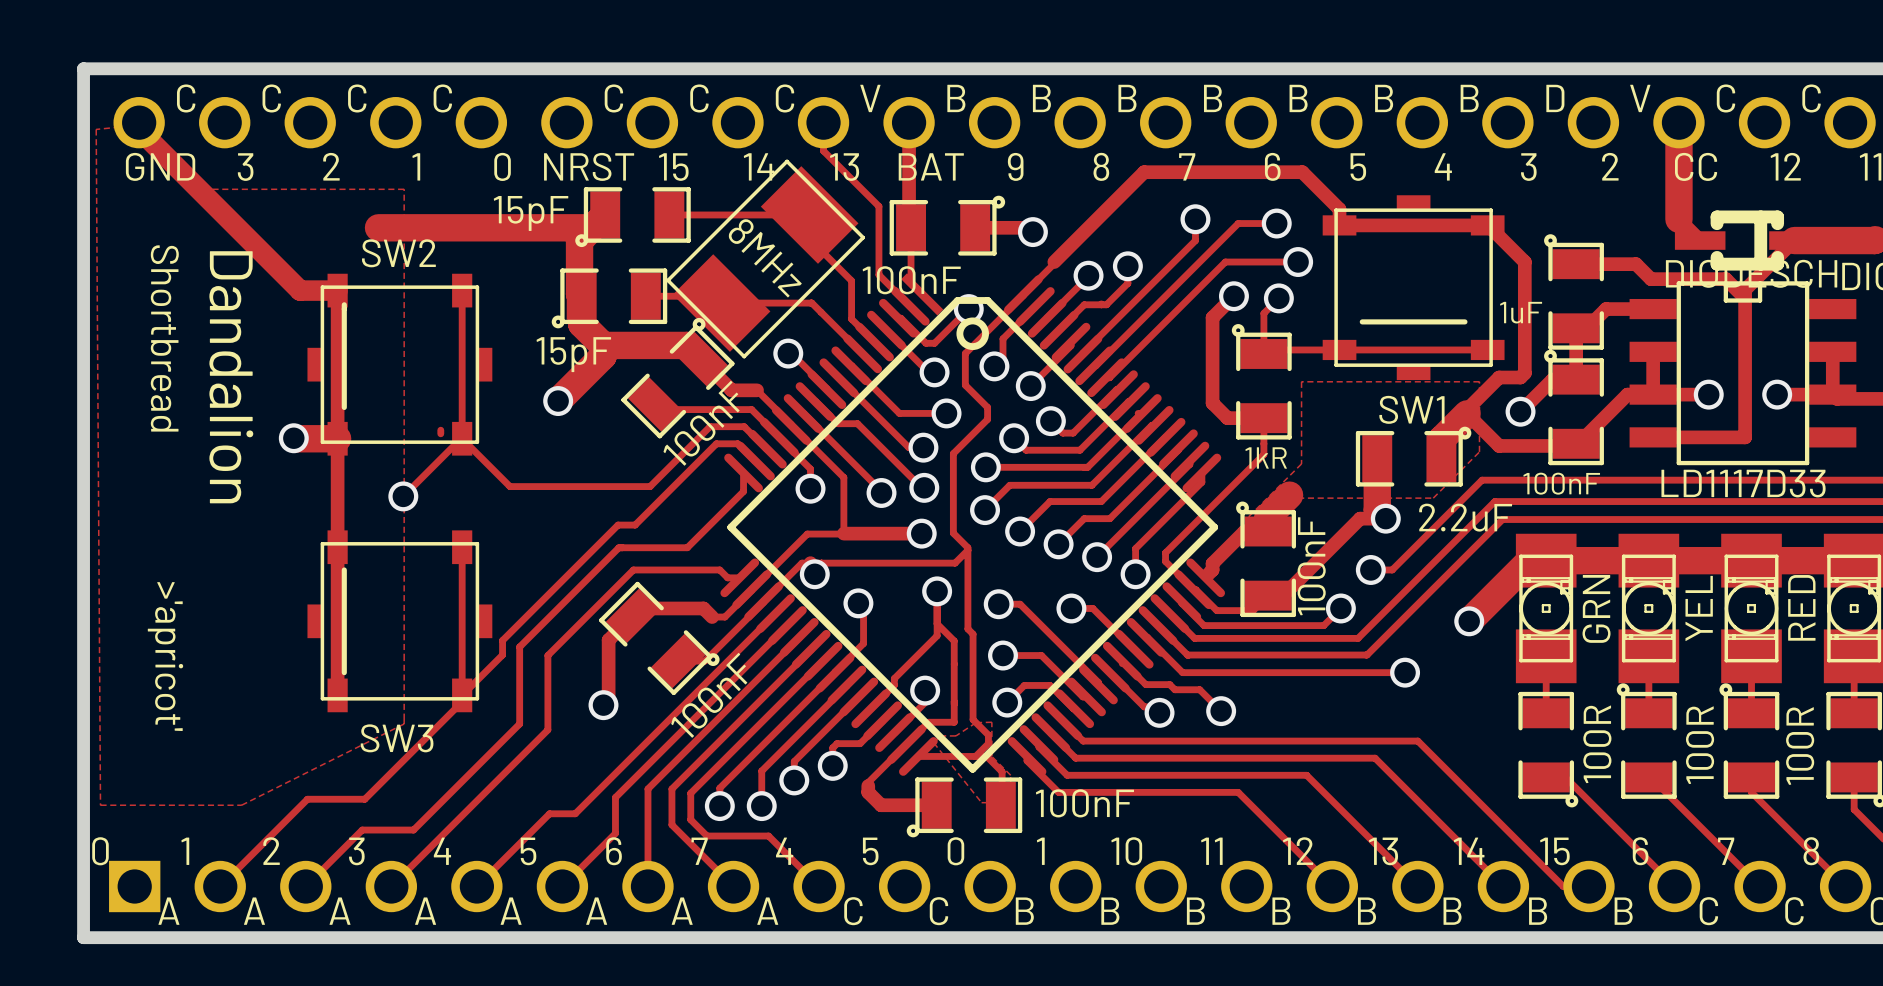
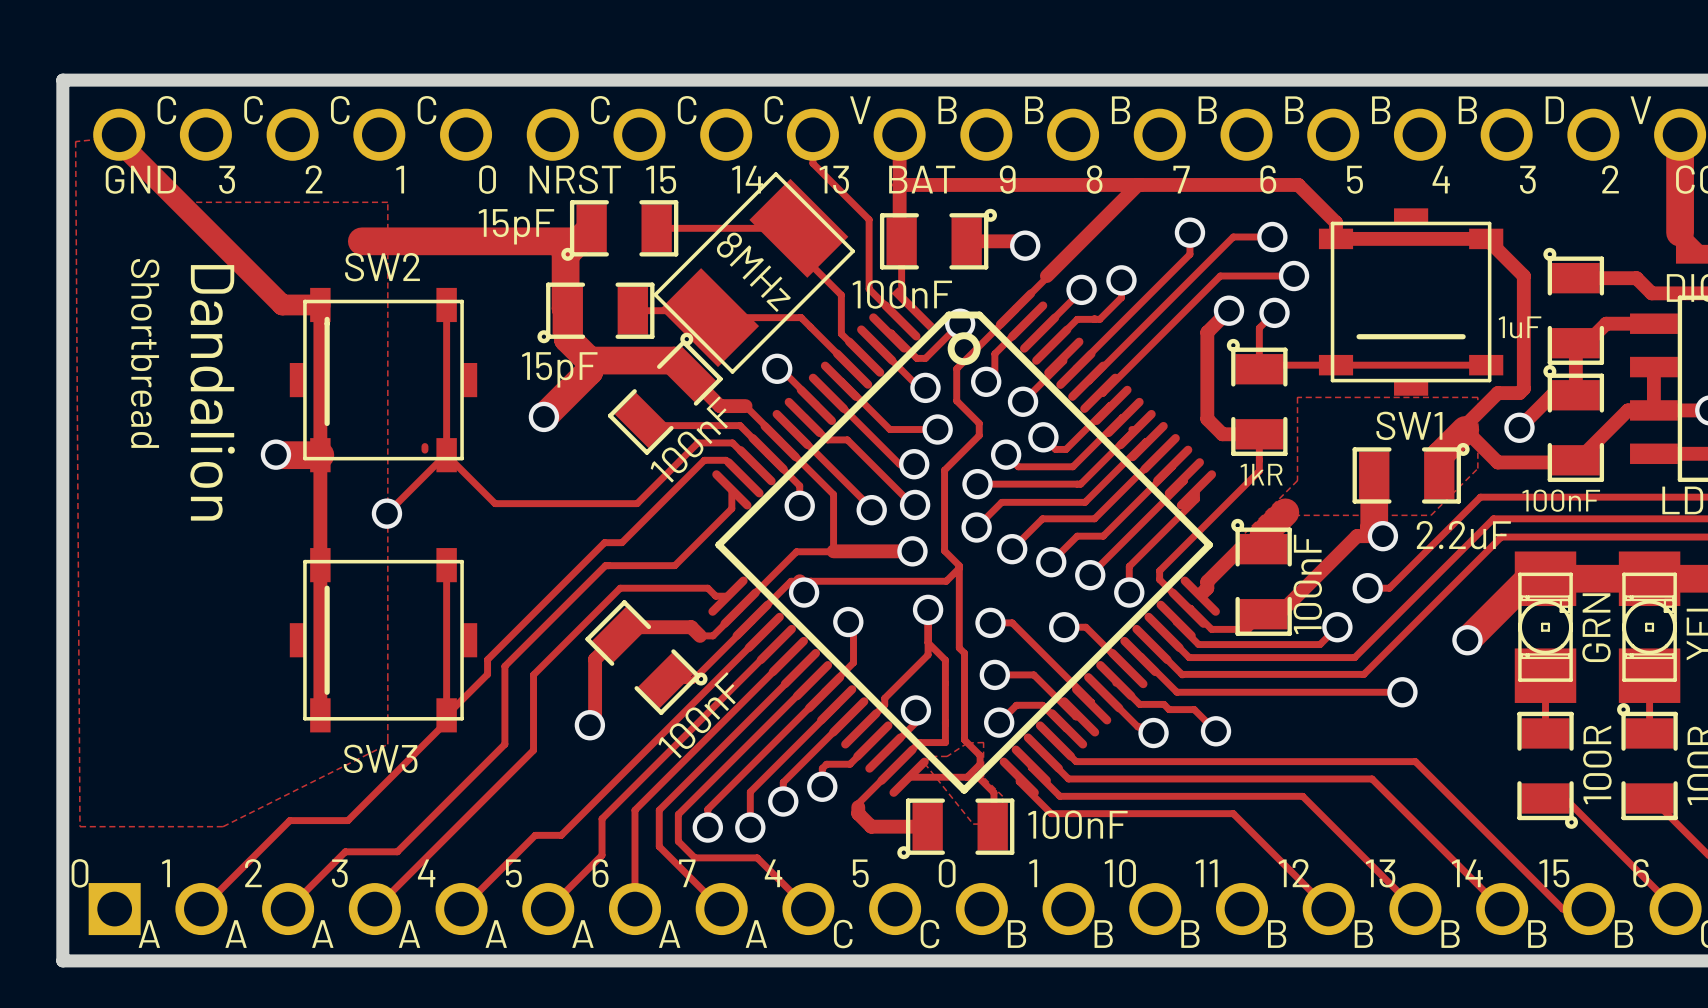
track: none -> (899, 184) (1137, 184)
text: >'apricot' (165, 656) -> none

